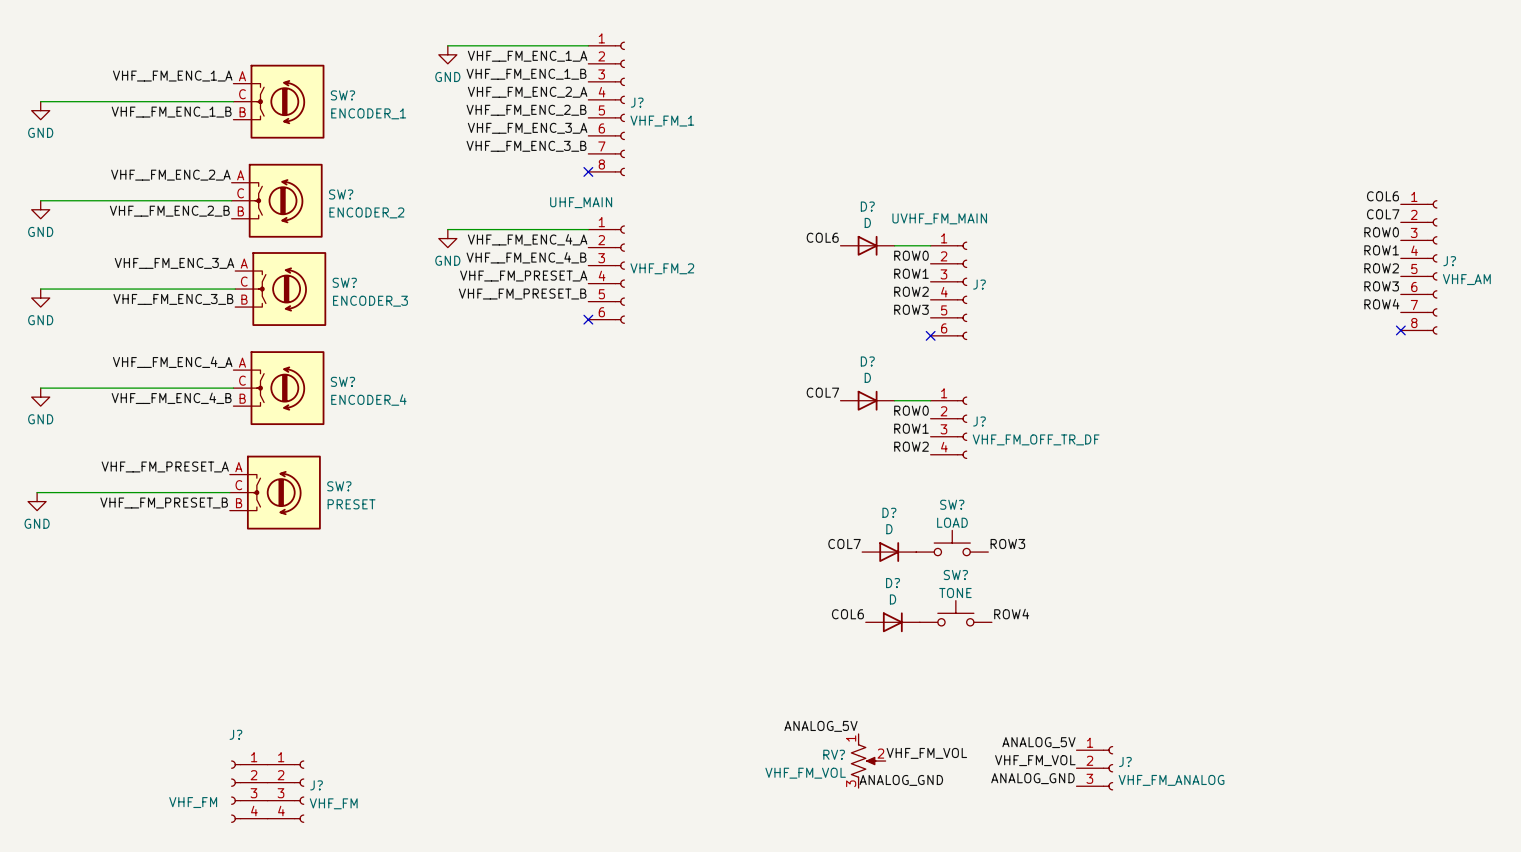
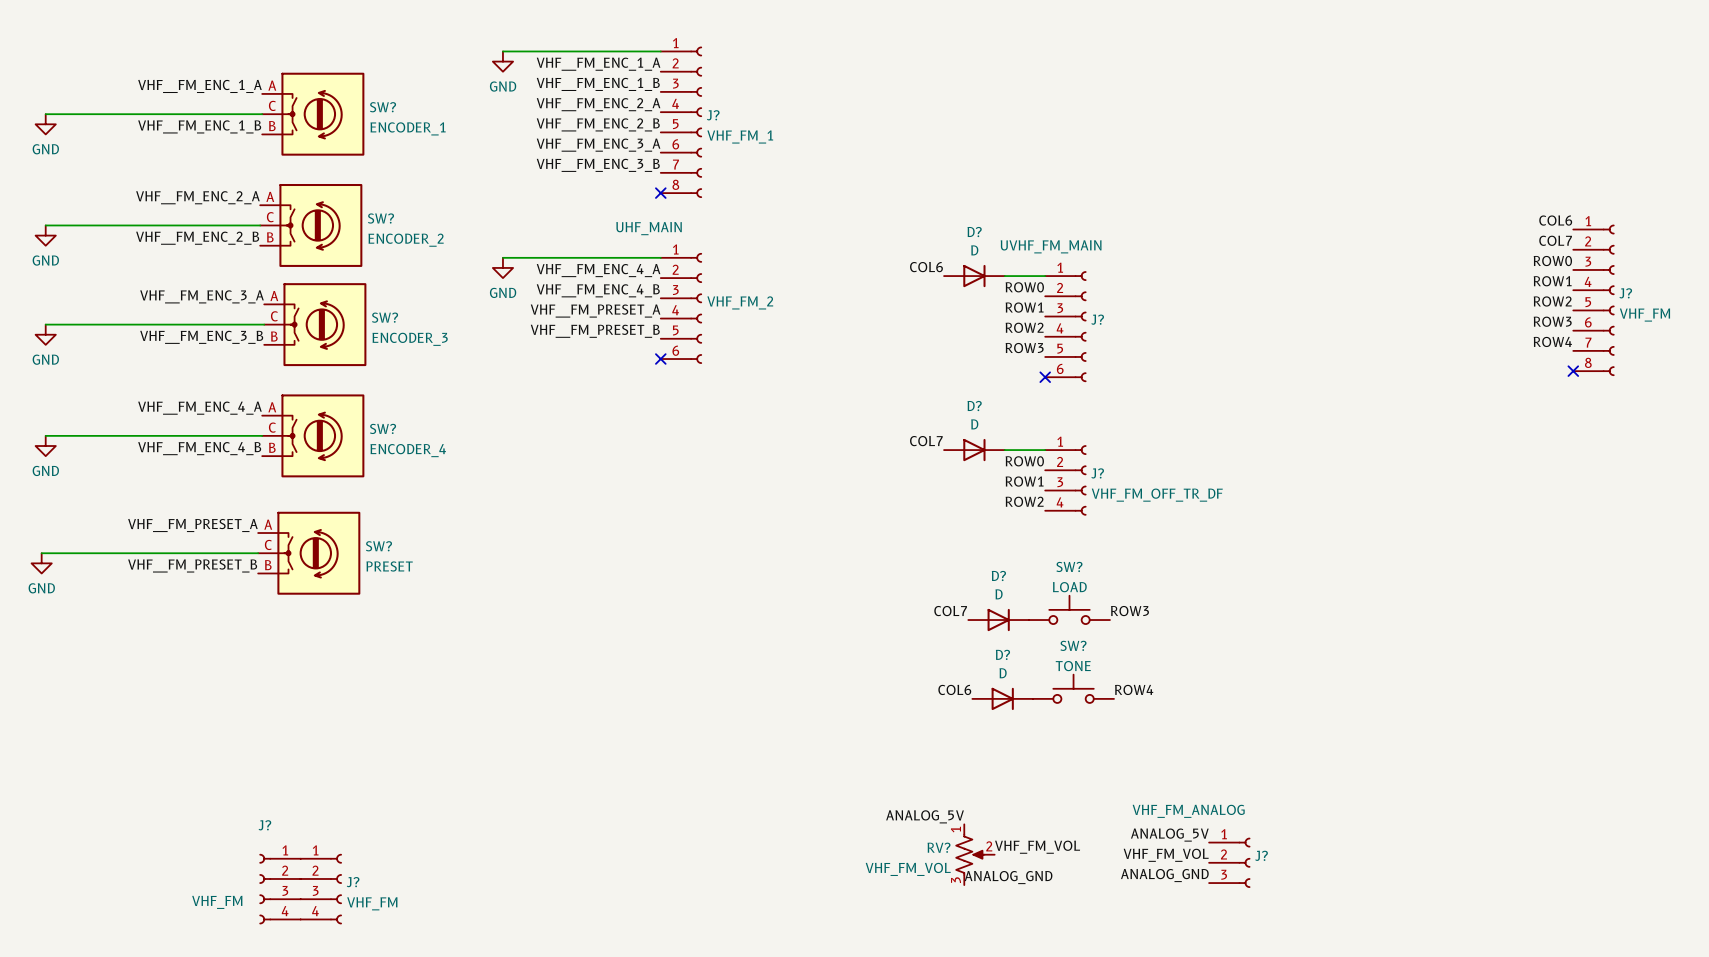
J? value: VHF_AM (1466, 279) -> VHF_FM (1644, 315)
J? value position: VHF_FM_ANALOG (1171, 780) -> VHF_FM_ANALOG (1188, 811)

